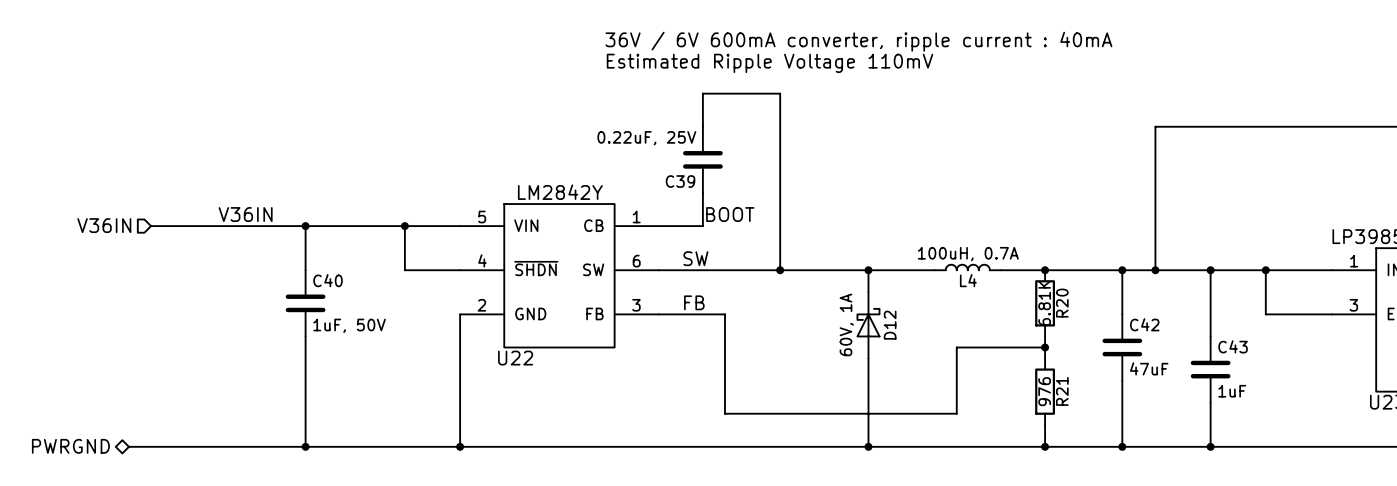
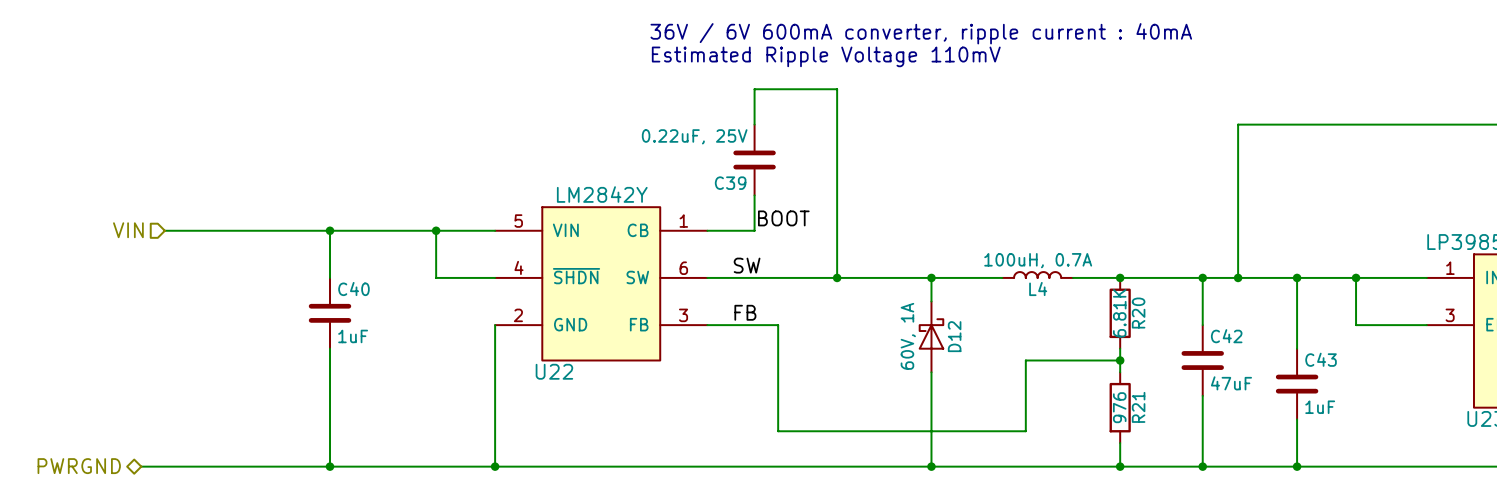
label: V36IN (245, 214) -> none
hierarchical label: V36IN (104, 225) -> VIN (128, 230)
C40 value: 1uF, 50V (349, 325) -> 1uF (353, 336)

